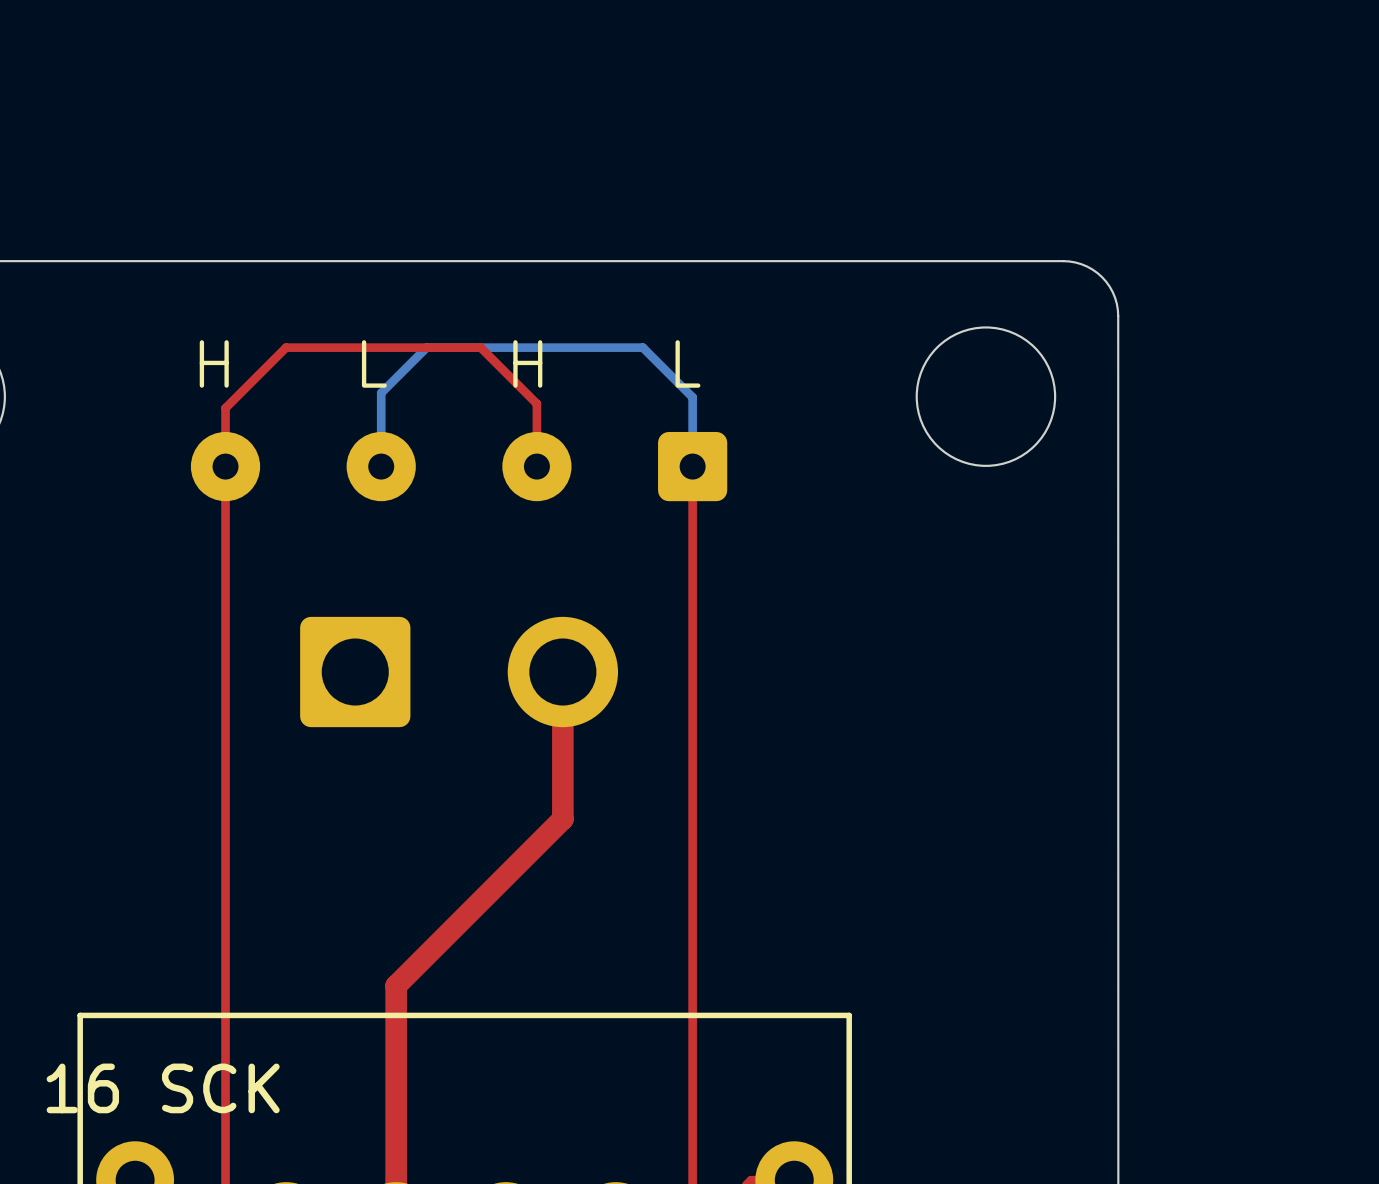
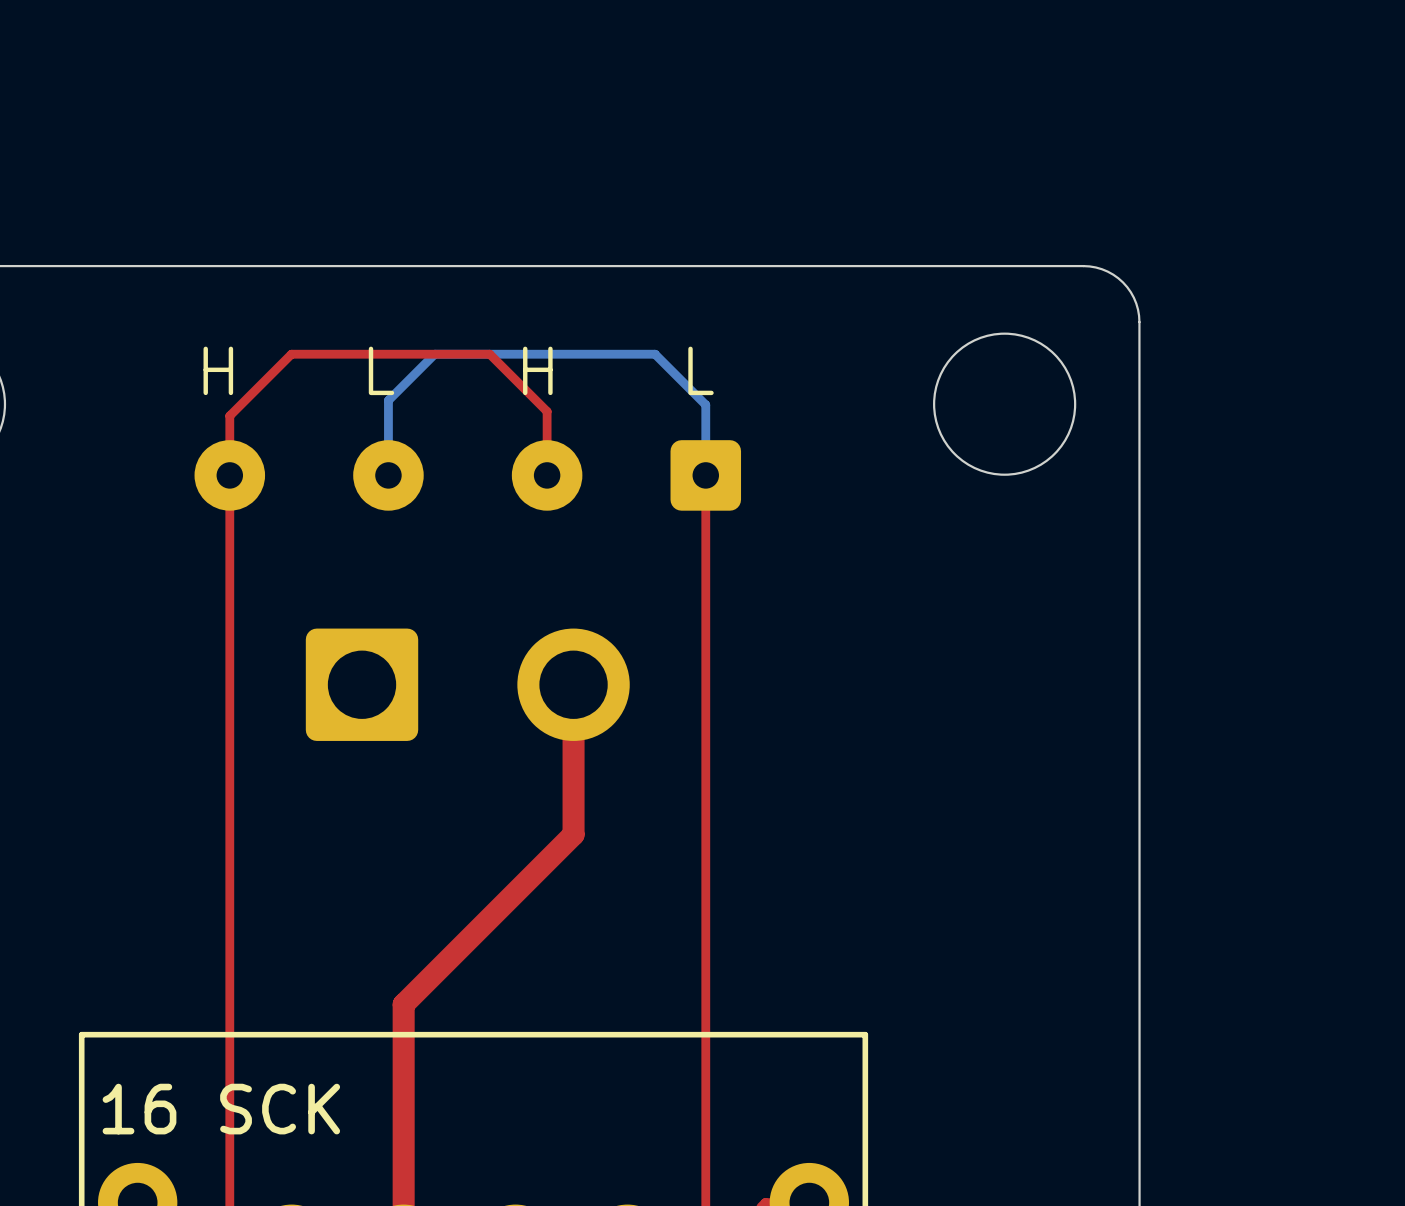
text position: 16 SCK (163, 1088) -> 16 SCK (221, 1109)

